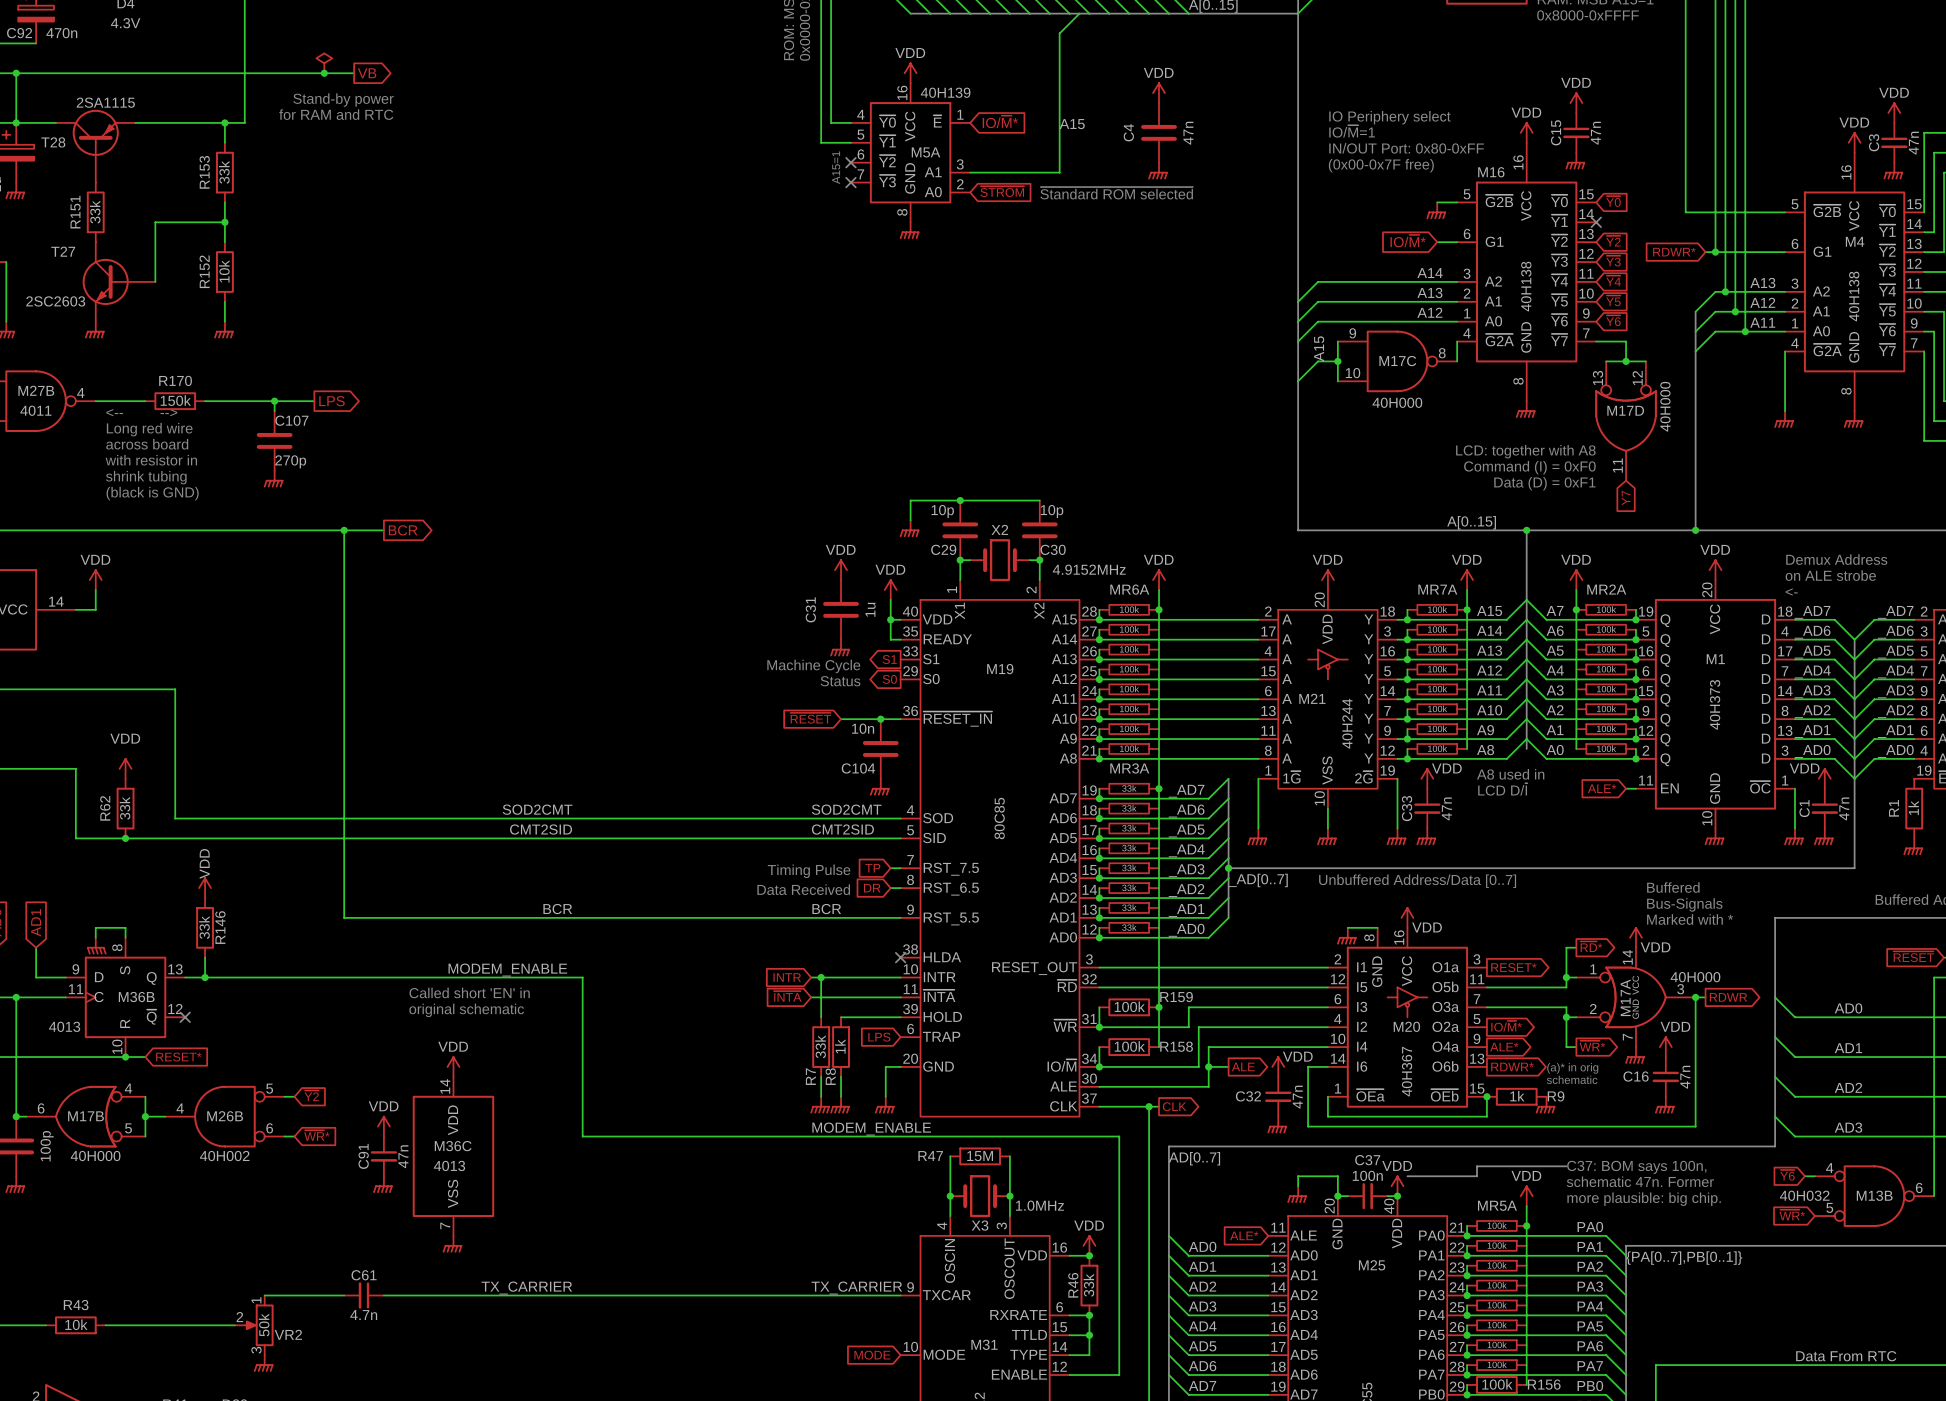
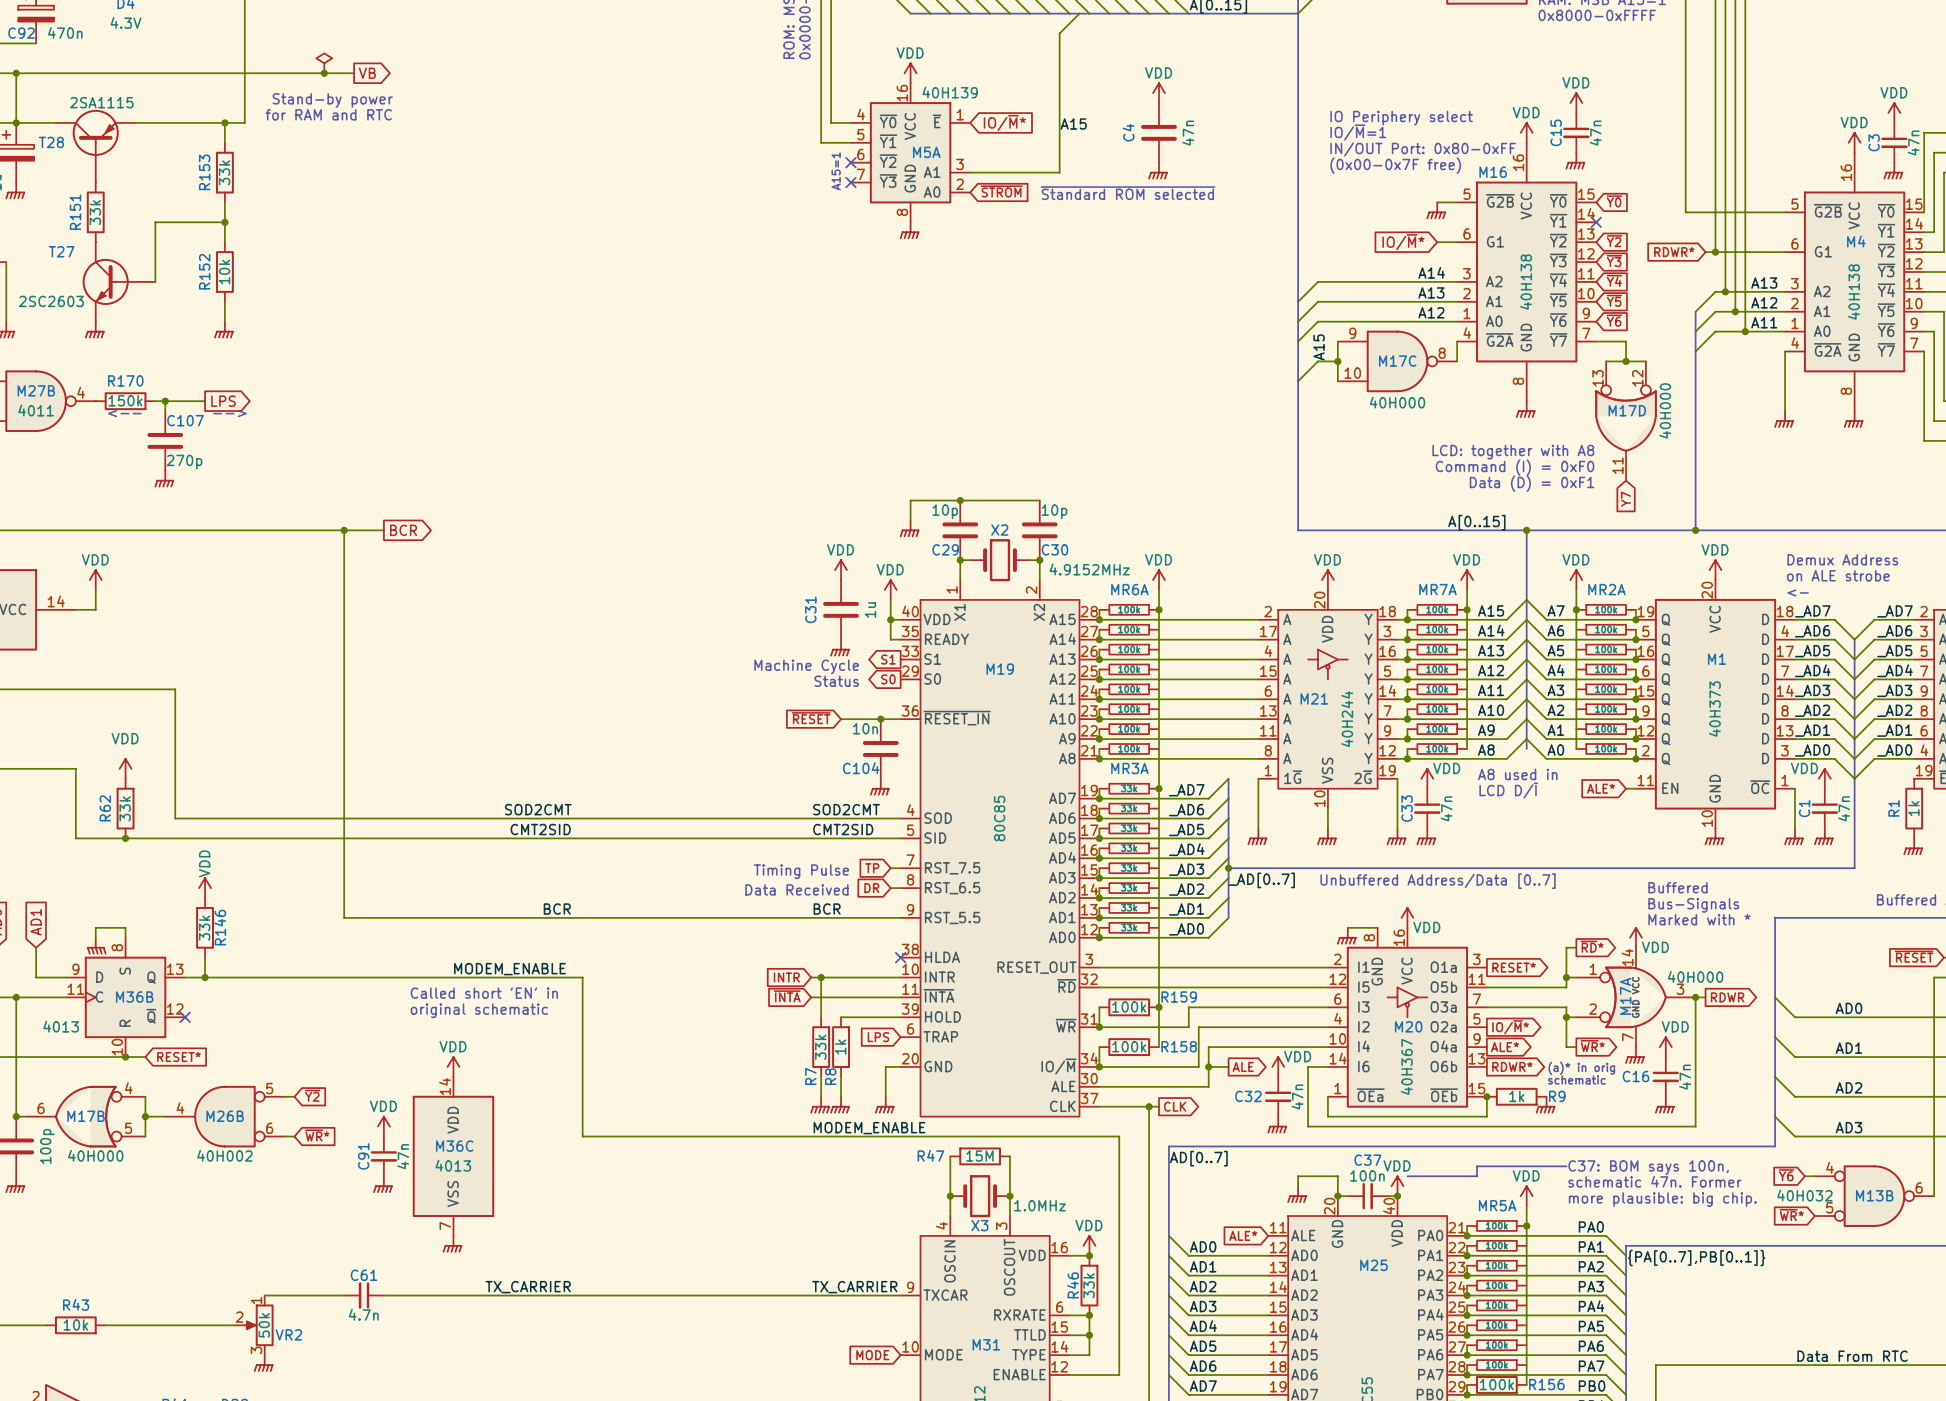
wire: (95, 401) (145, 401) -> none
junction: none -> (165, 401)
R170 position: (175, 401) -> (125, 401)
wire: (205, 401) (314, 401) -> (205, 401) (155, 401)
wire: (274, 401) (274, 411) -> (165, 401) (165, 411)
junction: (274, 401) -> none
global label position: LPS (331, 401) -> LPS (223, 401)
text: Long red wire (149, 429) -> none
C107 position: (274, 440) -> (165, 440)
text: across board (147, 444) -> none
text: with resistor in (151, 460) -> none
text: shrink tubing (146, 477) -> none
power symbol position: (273, 479) -> (164, 479)
text: (black is GND) (152, 493) -> none

